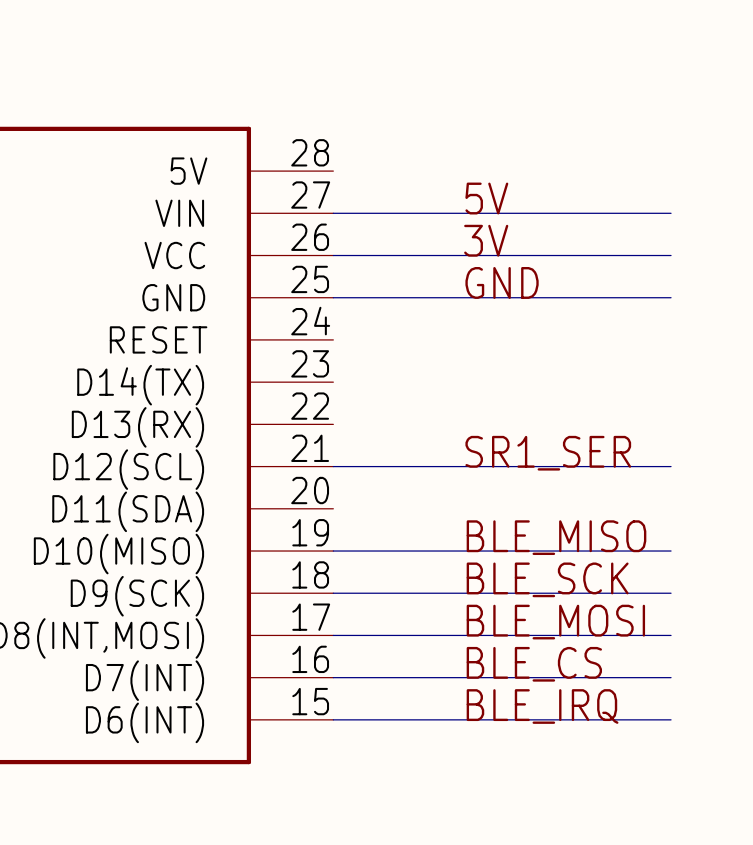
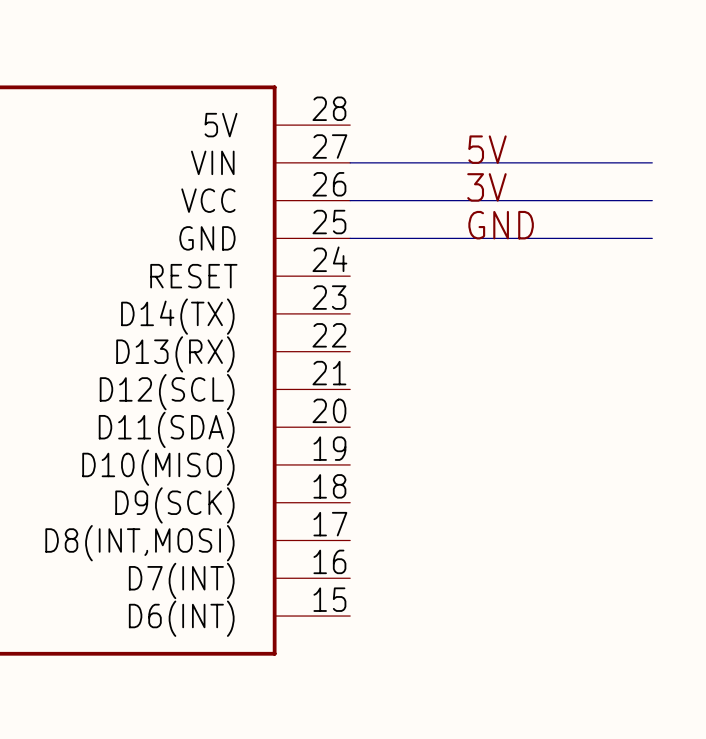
label: SR1_SER (548, 453) -> none
wire: (333, 466) (671, 466) -> none
label: BLE_MISO (556, 537) -> none
wire: (333, 551) (671, 551) -> none
label: BLE_SCK (547, 579) -> none
wire: (333, 593) (671, 593) -> none
label: BLE_MOSI (555, 622) -> none
wire: (333, 635) (671, 635) -> none
label: BLE_CS (534, 664) -> none
wire: (333, 677) (671, 677) -> none
label: BLE_IRQ (542, 706) -> none
wire: (333, 719) (671, 719) -> none

